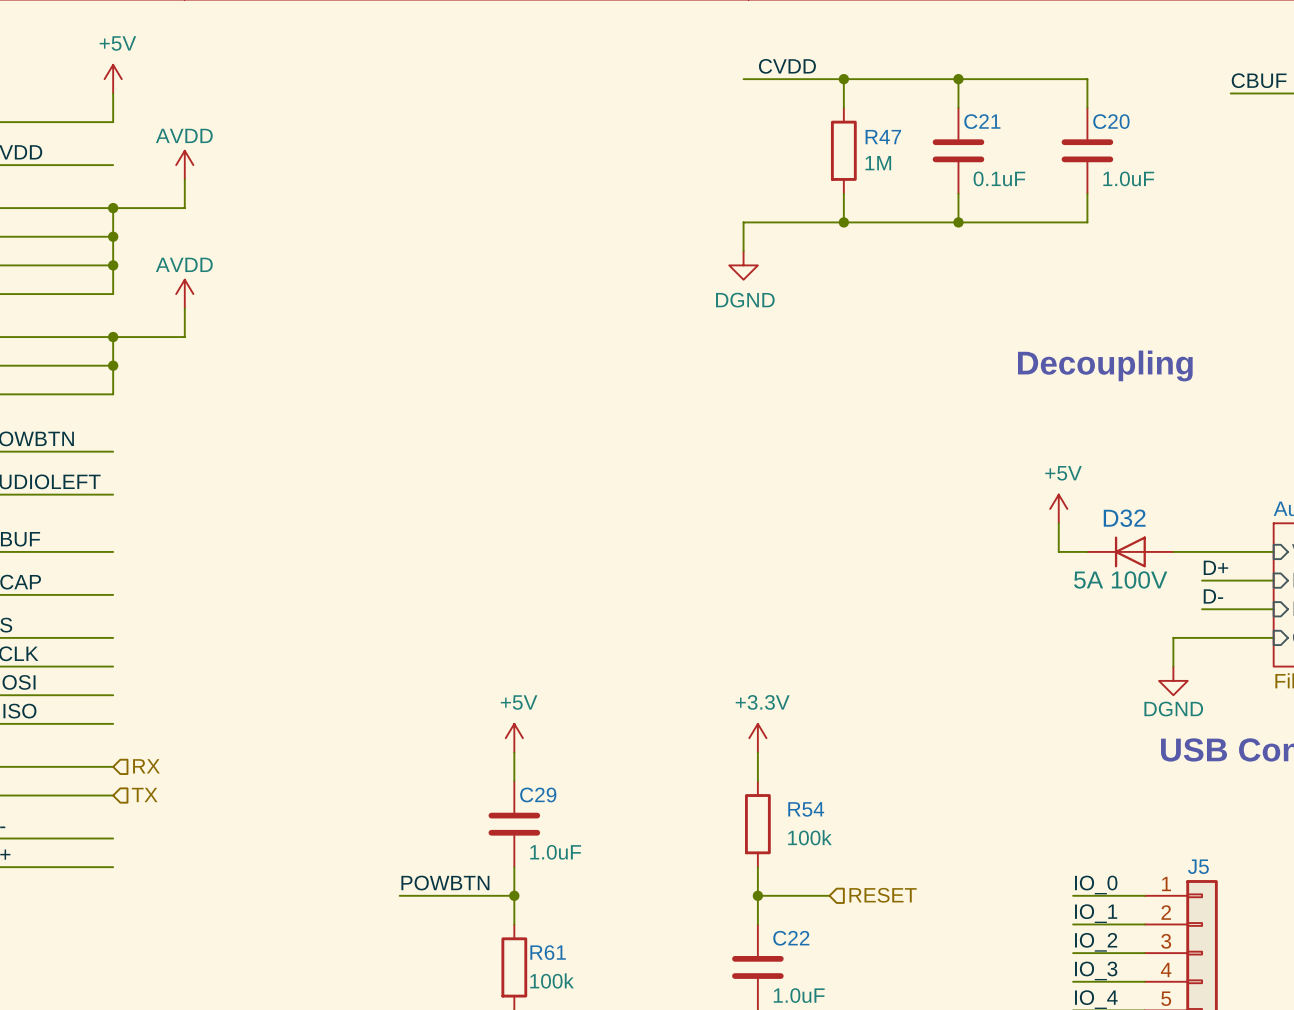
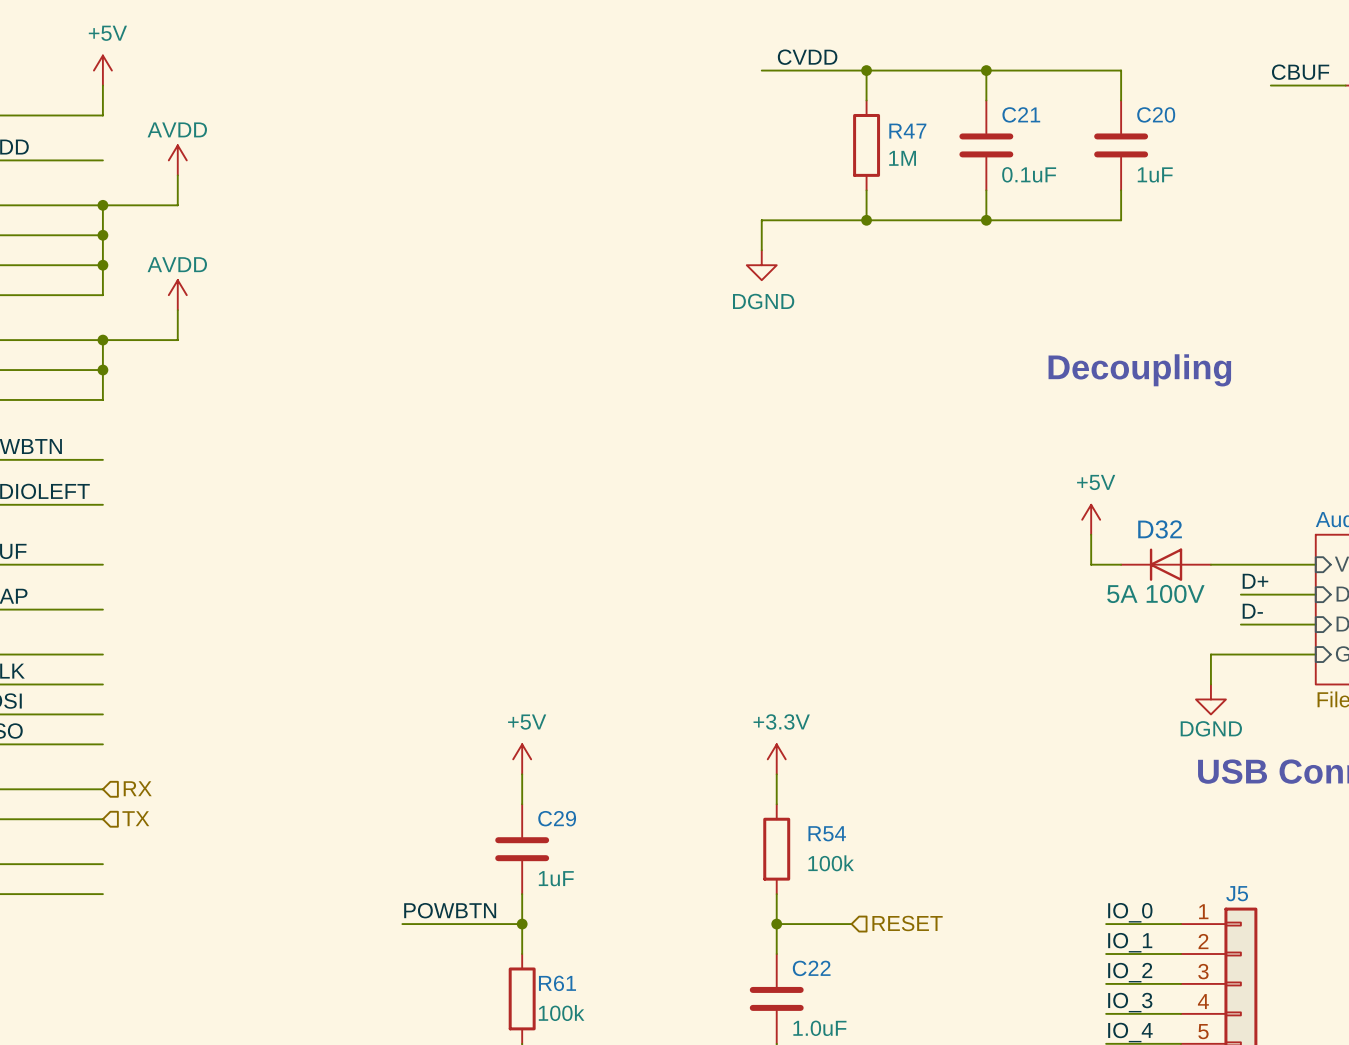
C21 name position: C21 (982, 121) -> C21 (1021, 114)
C20 name position: C20 (1111, 121) -> C20 (1156, 114)
C20 value: 1.0uF (1128, 178) -> 1uF (1155, 174)
C29 name position: C29 (538, 794) -> C29 (557, 818)
C29 value: 1.0uF (555, 852) -> 1uF (556, 878)

